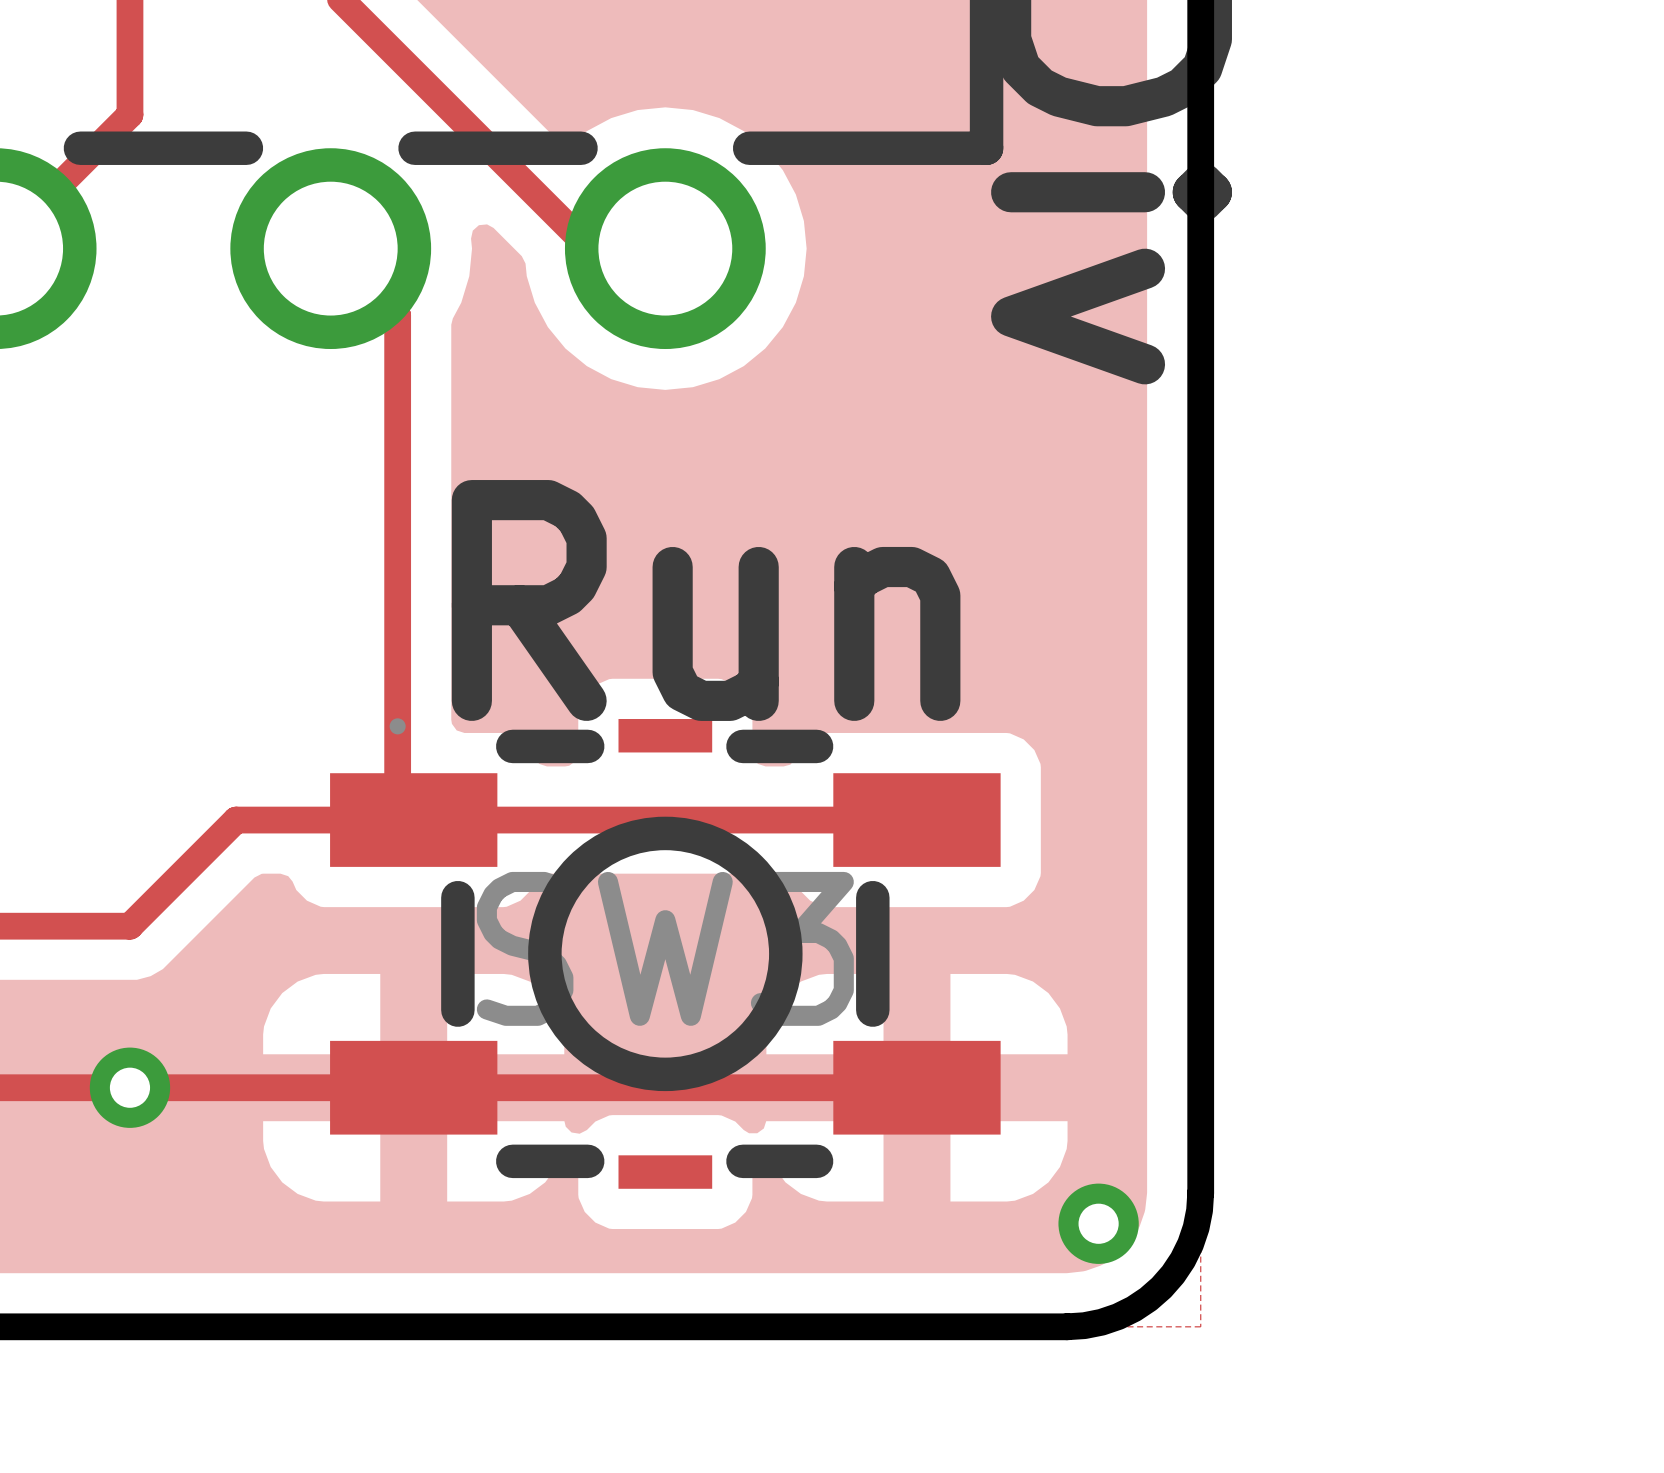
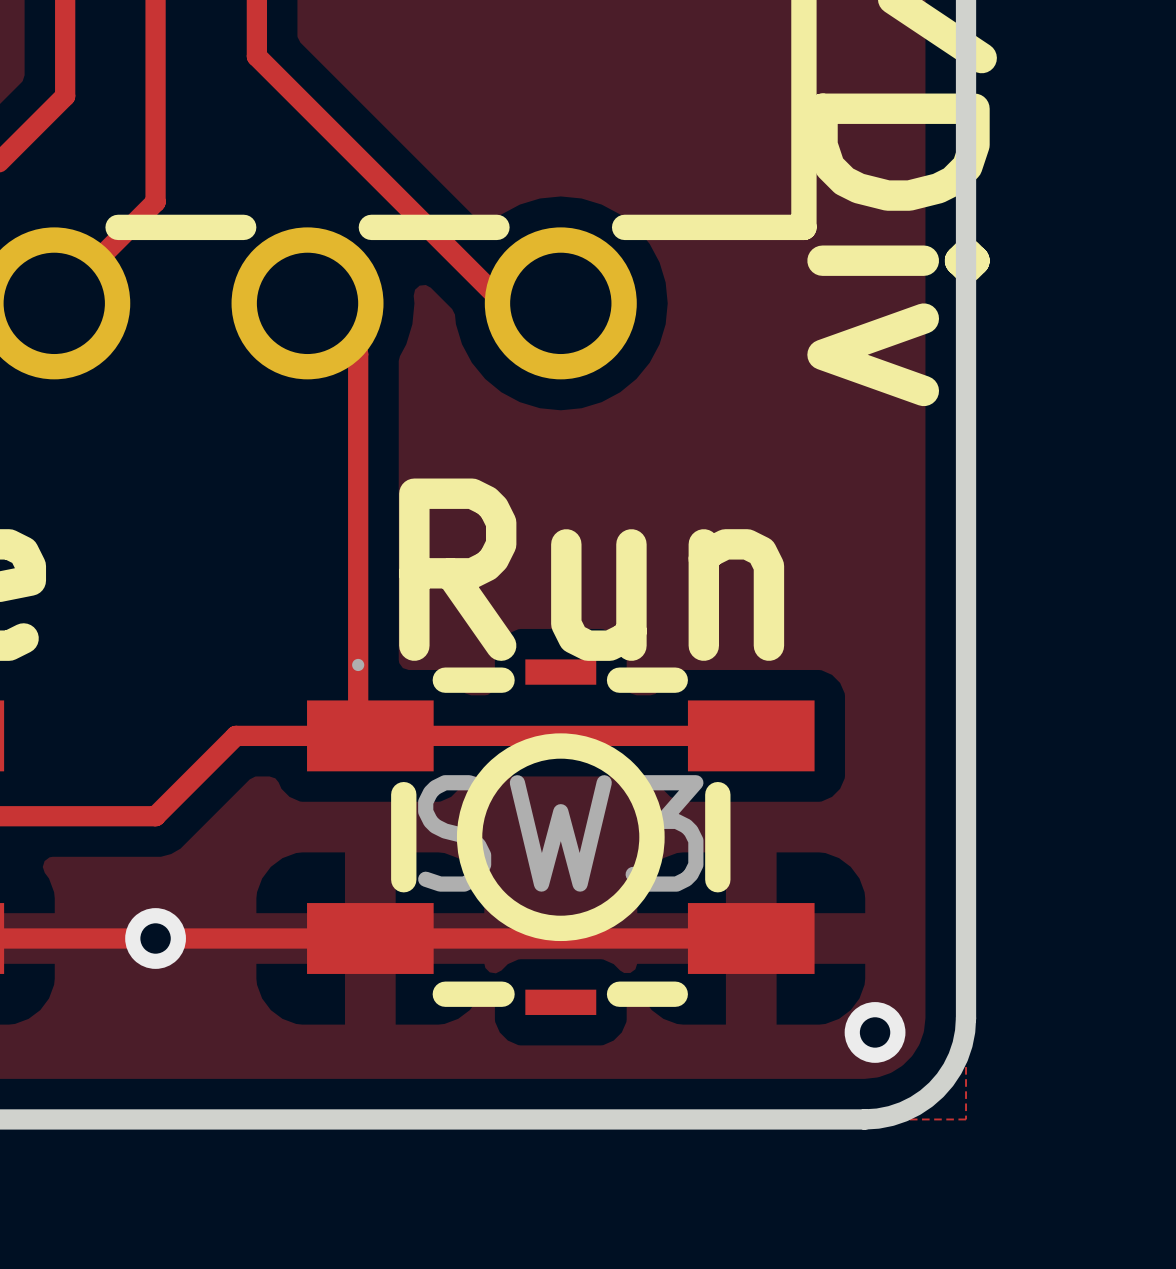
via position: (1098, 1223) -> (875, 1032)

